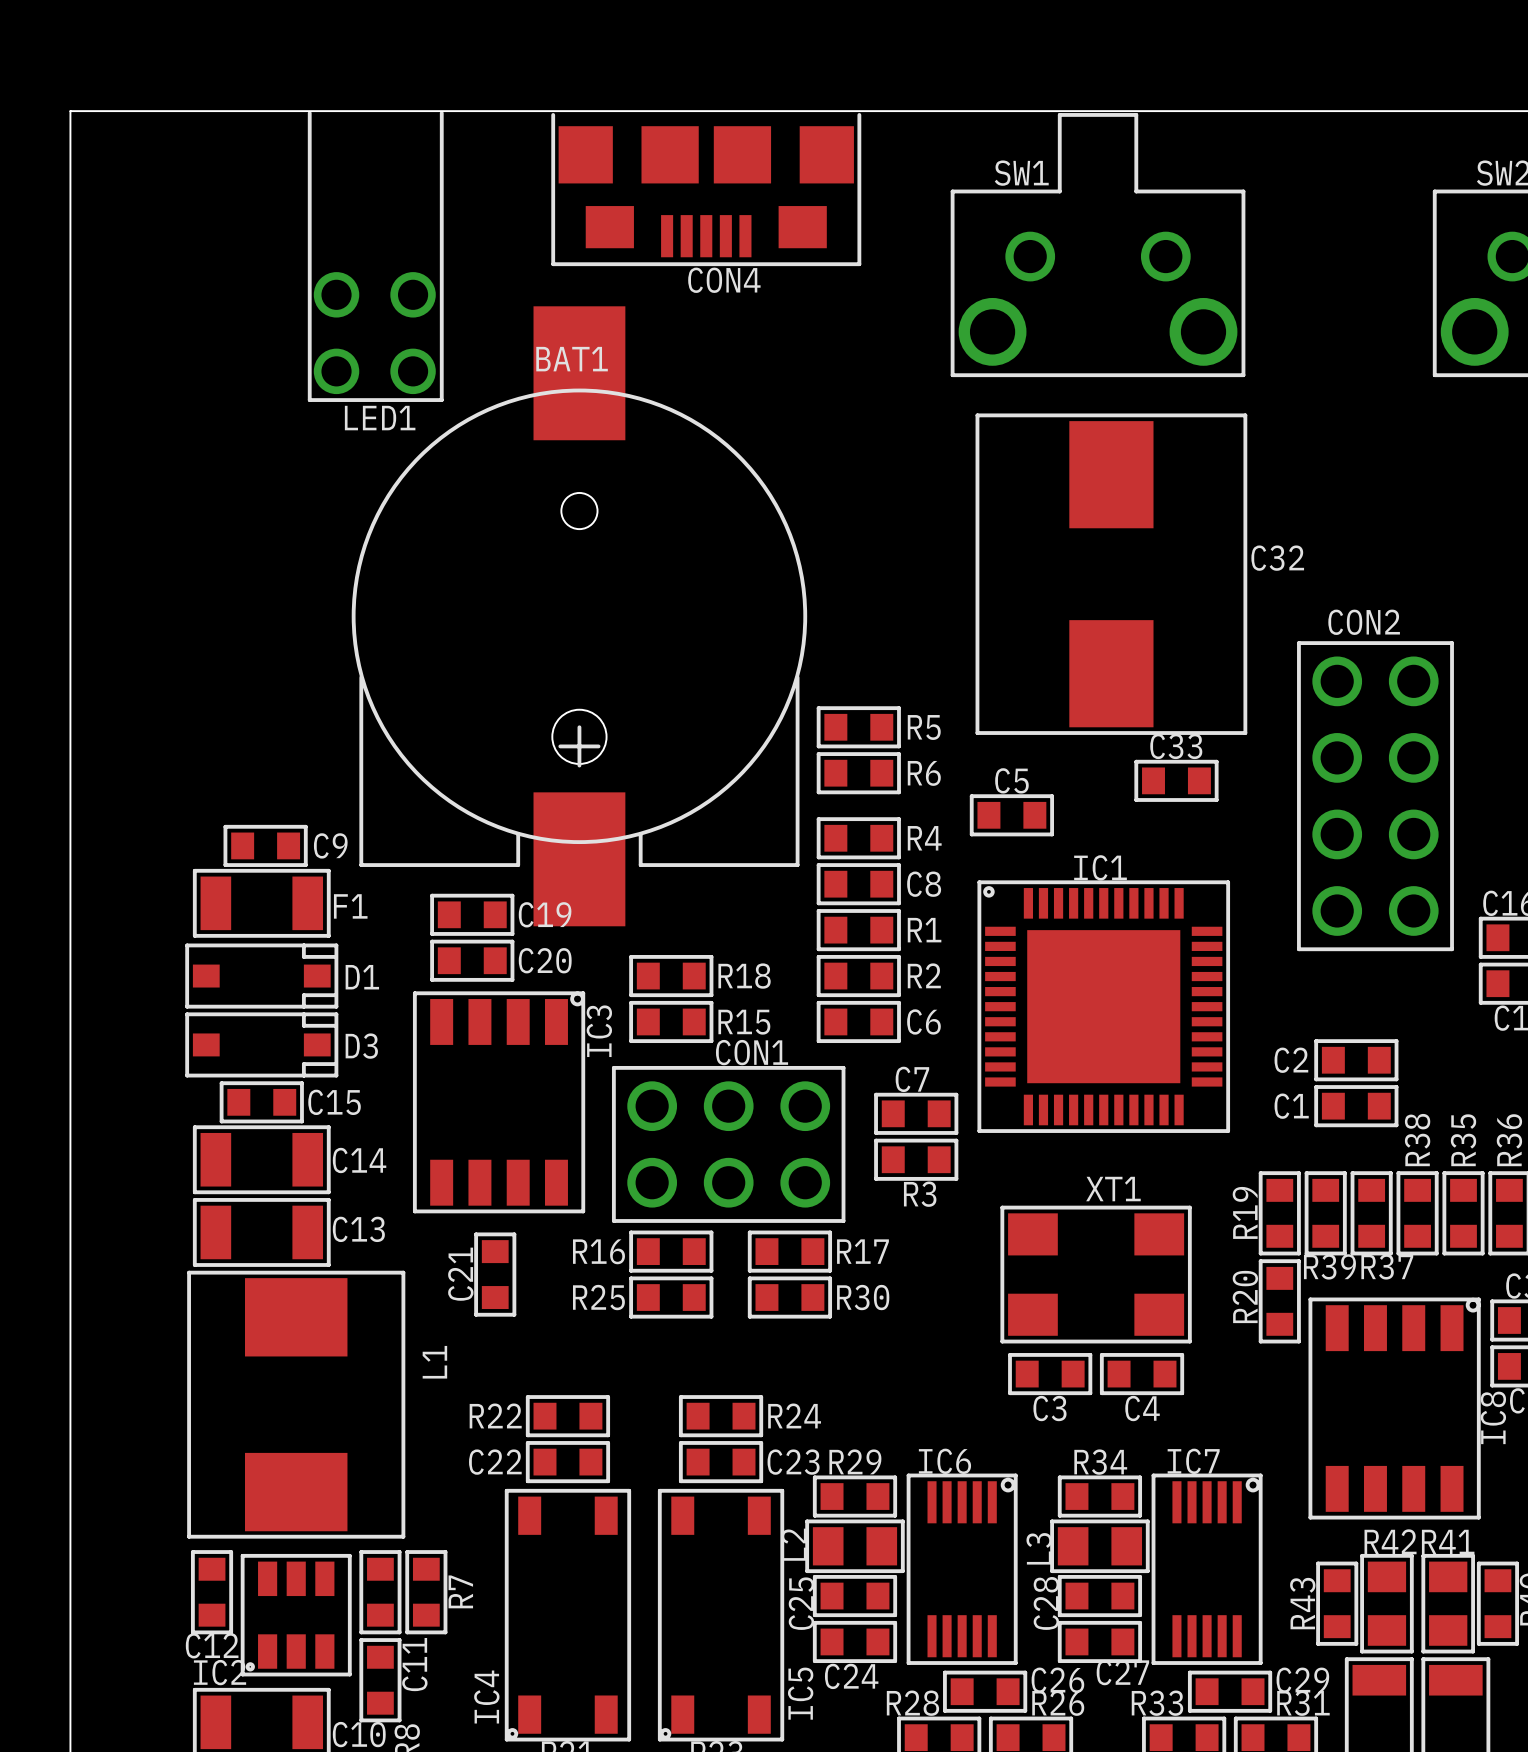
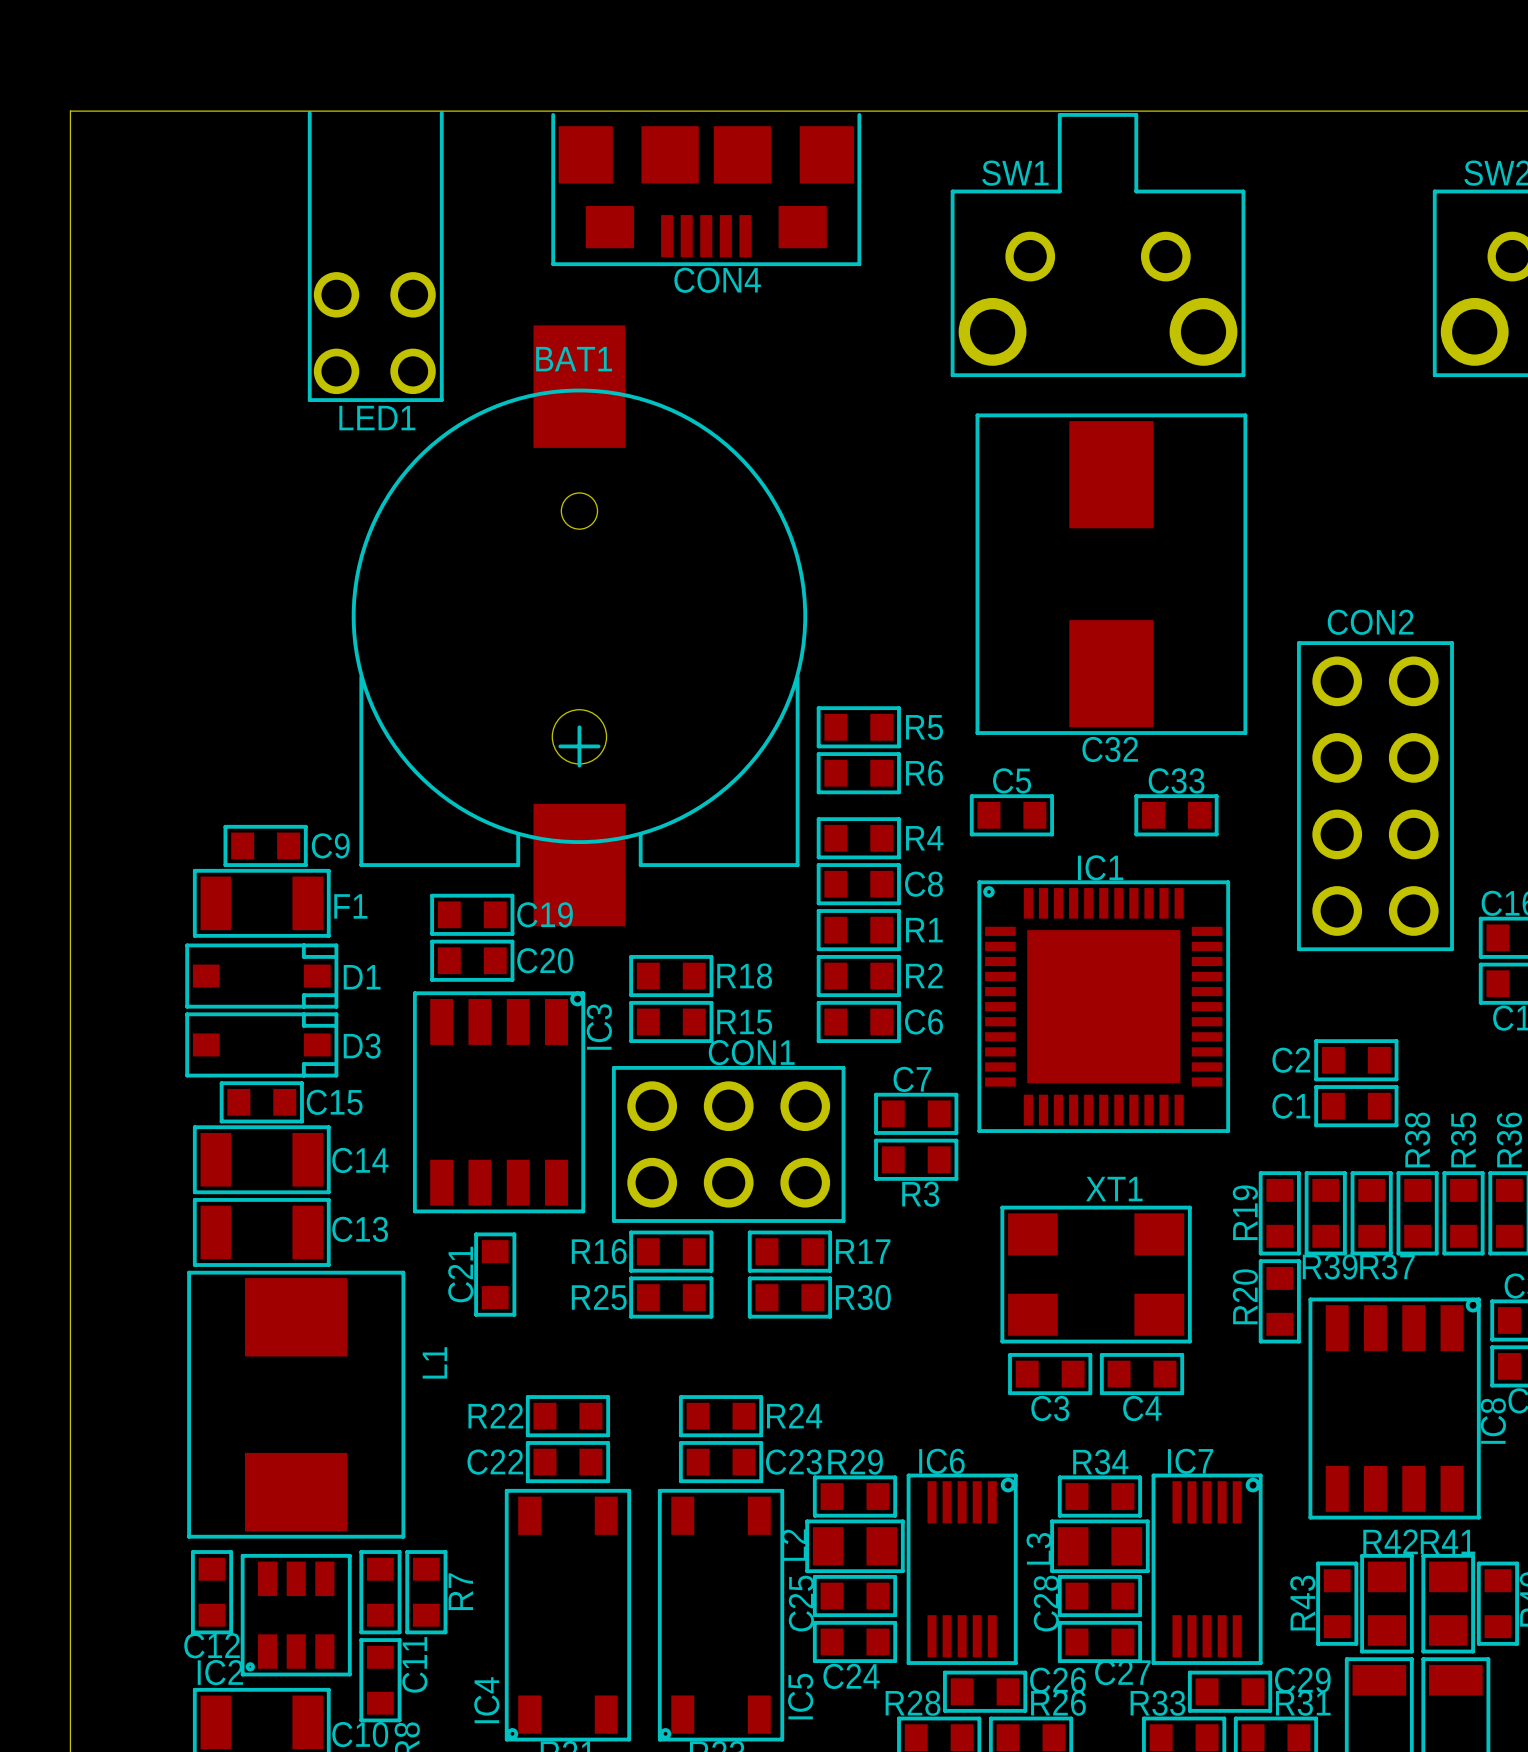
BAT1 footprint: [351, 306, 808, 927] -> [351, 325, 808, 927]
C32 name position: C32 (1277, 558) -> C32 (1110, 749)
C33 position: (1176, 780) -> (1176, 815)

